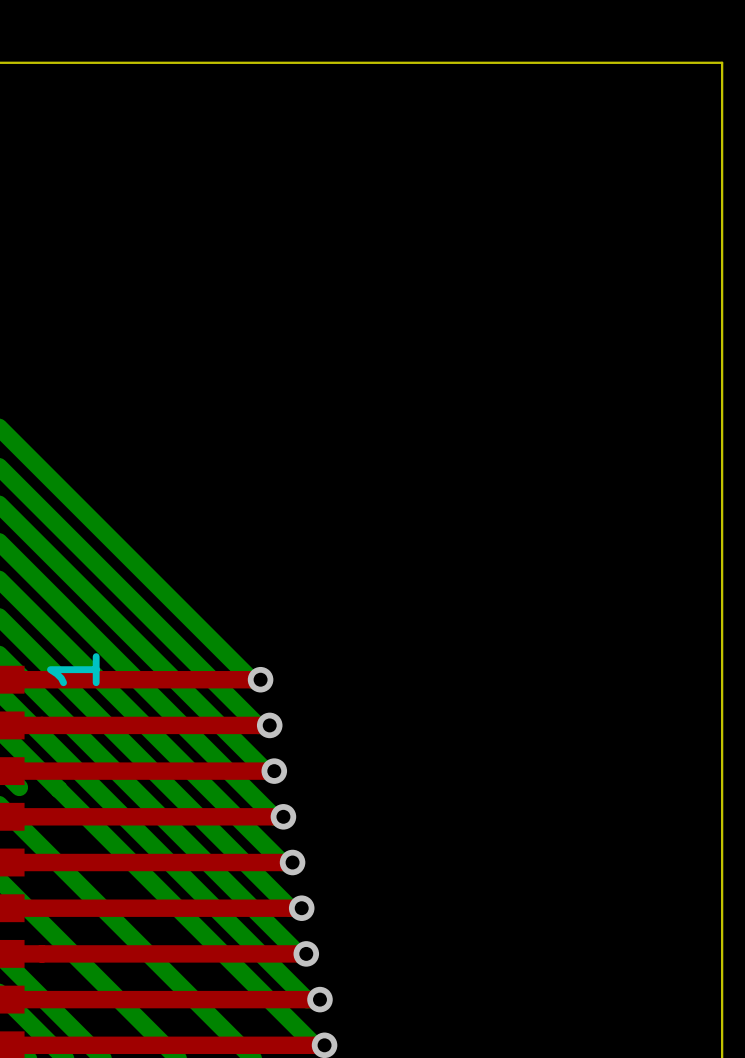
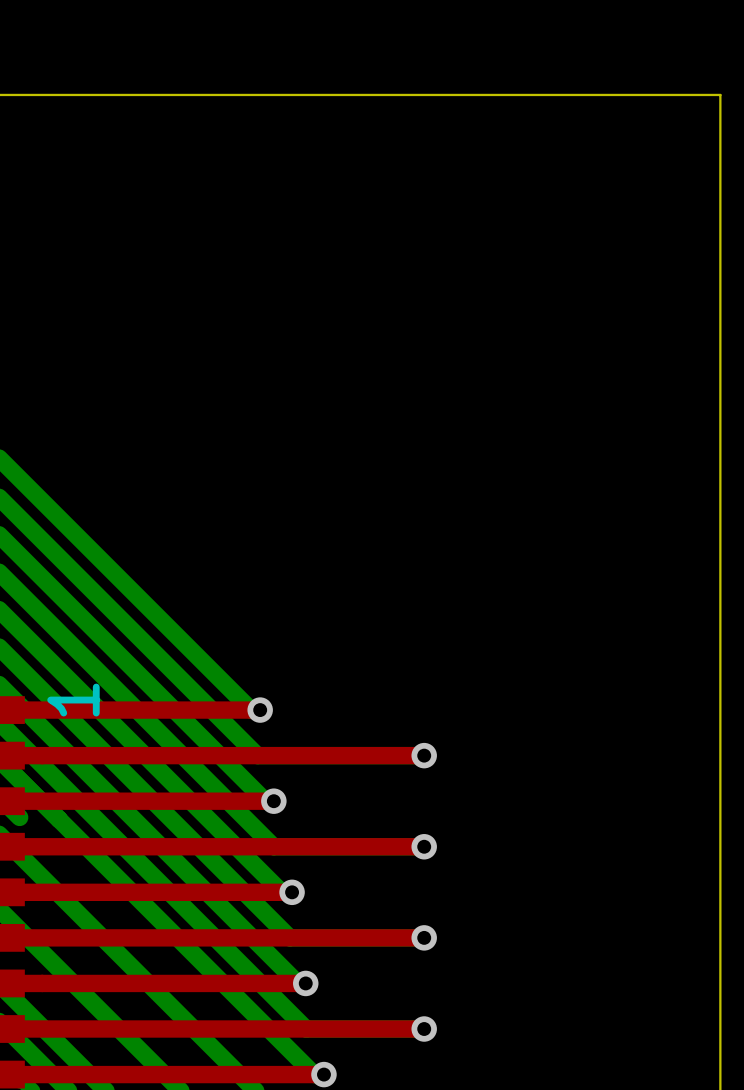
top track: none -> (269, 755) (424, 755)
via: (269, 725) -> none
via: none -> (424, 755)
top track: none -> (282, 846) (424, 846)
via: (283, 816) -> none
via: none -> (424, 846)
top track: none -> (301, 937) (424, 937)
via: (301, 908) -> none
via: none -> (424, 937)
top track: none -> (319, 1029) (424, 1029)
via: (319, 999) -> none
via: none -> (424, 1029)

